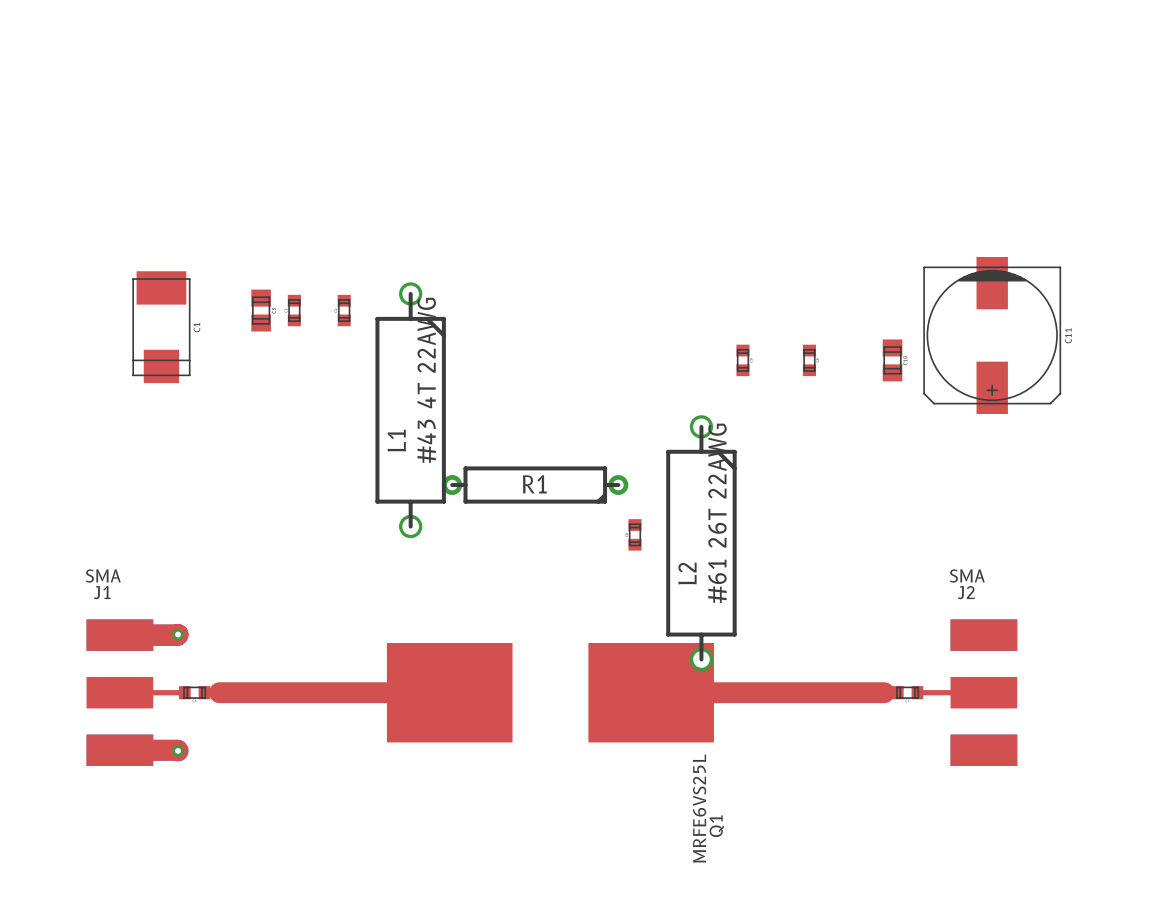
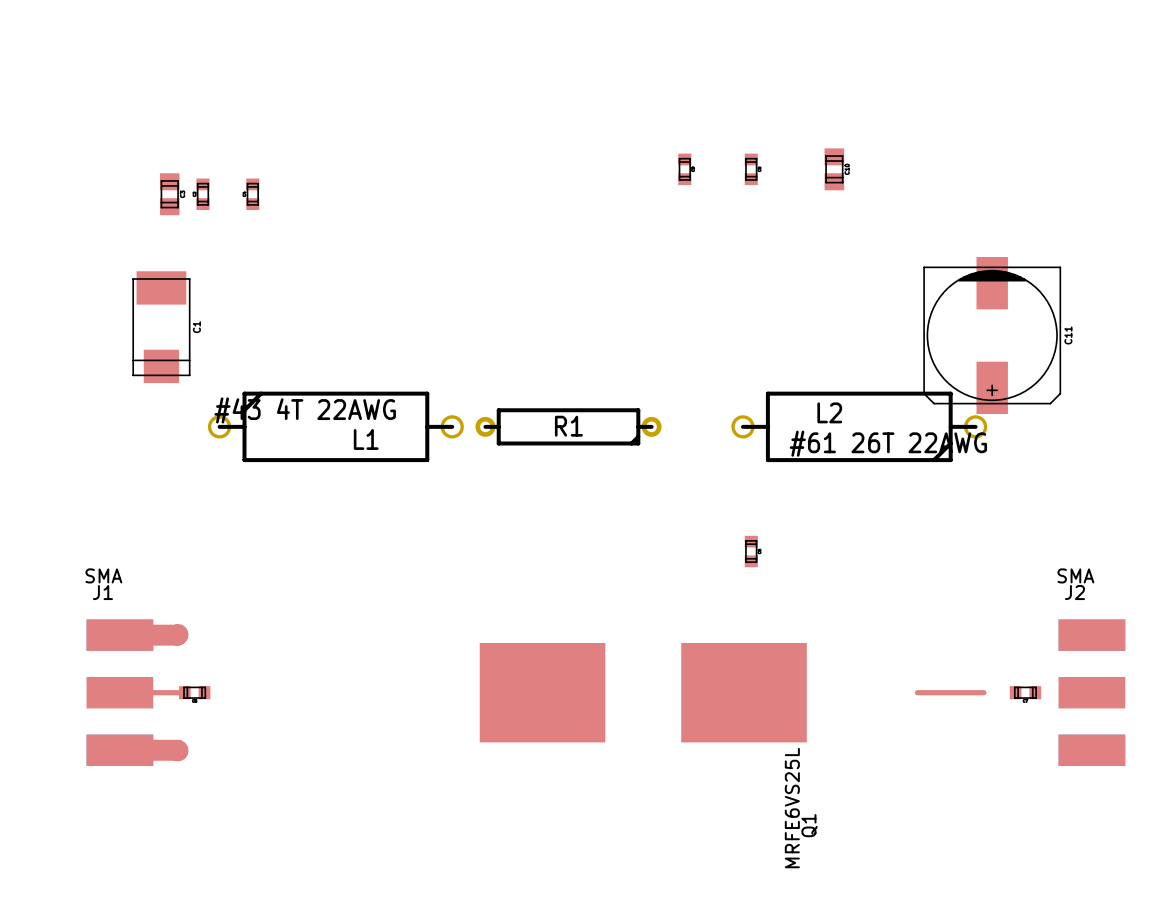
part position: (261, 310) -> (169, 194)
part position: (294, 310) -> (202, 194)
part position: (344, 310) -> (252, 194)
part position: (742, 360) -> (684, 169)
part position: (809, 360) -> (751, 169)
part position: (892, 360) -> (834, 169)
L1 rotation: 0° (410, 410) -> 90° counterclockwise (335, 426)
R1 position: (535, 485) -> (568, 426)
part rotation: 0° (634, 534) -> 180° (751, 551)
part position: (634, 534) -> (751, 551)
L2 rotation: 0° (701, 543) -> 90° clockwise (859, 426)
L2 position: (701, 543) -> (859, 426)
via: (178, 634) -> none
top track: (204, 692) (449, 692) -> none
Q1 position: (550, 692) -> (643, 692)
top track: (651, 692) (897, 692) -> none
part position: (907, 692) -> (1025, 692)
J2 position: (983, 692) -> (1091, 692)
via: (178, 750) -> none

